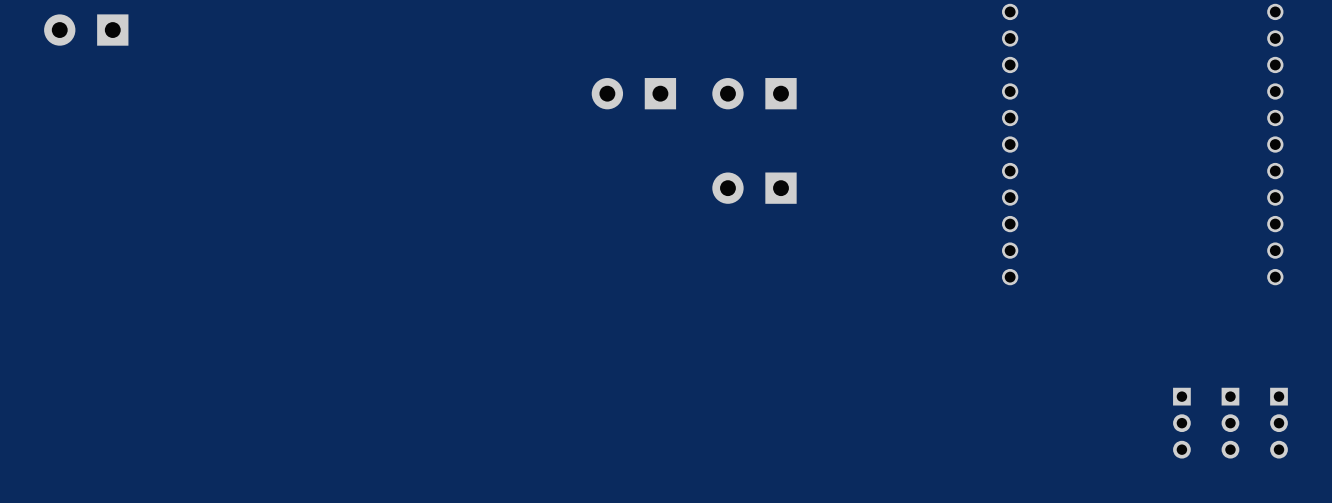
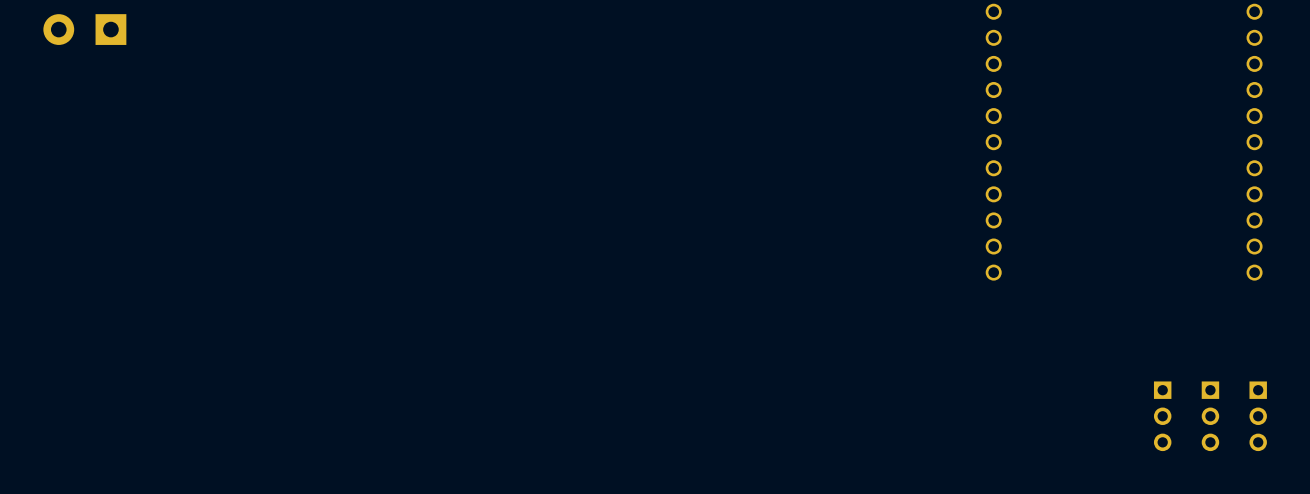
part: (633, 93) -> none
part: (754, 93) -> none
part: (754, 188) -> none

